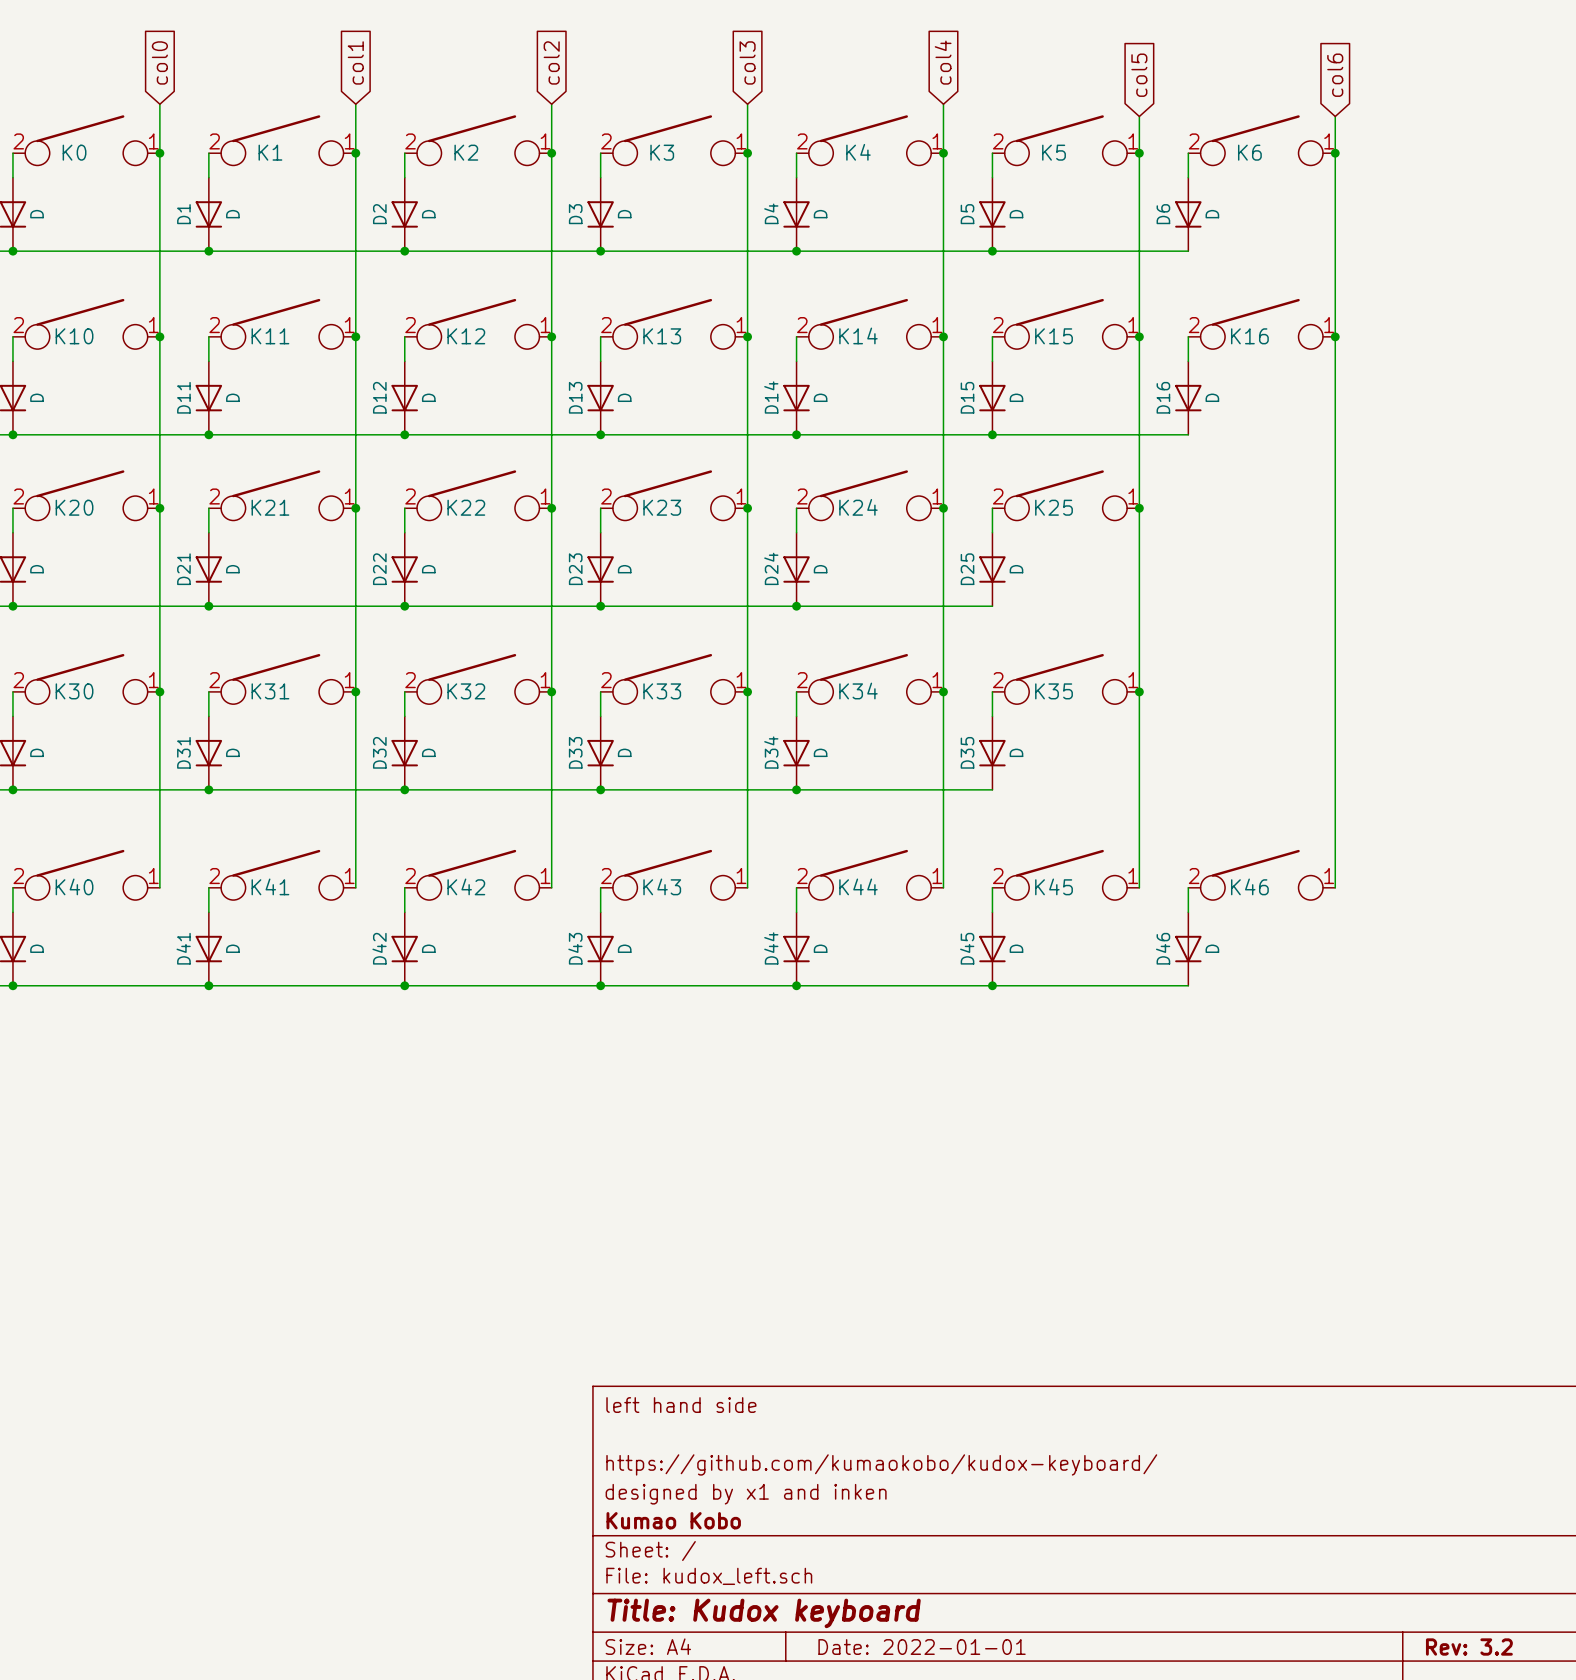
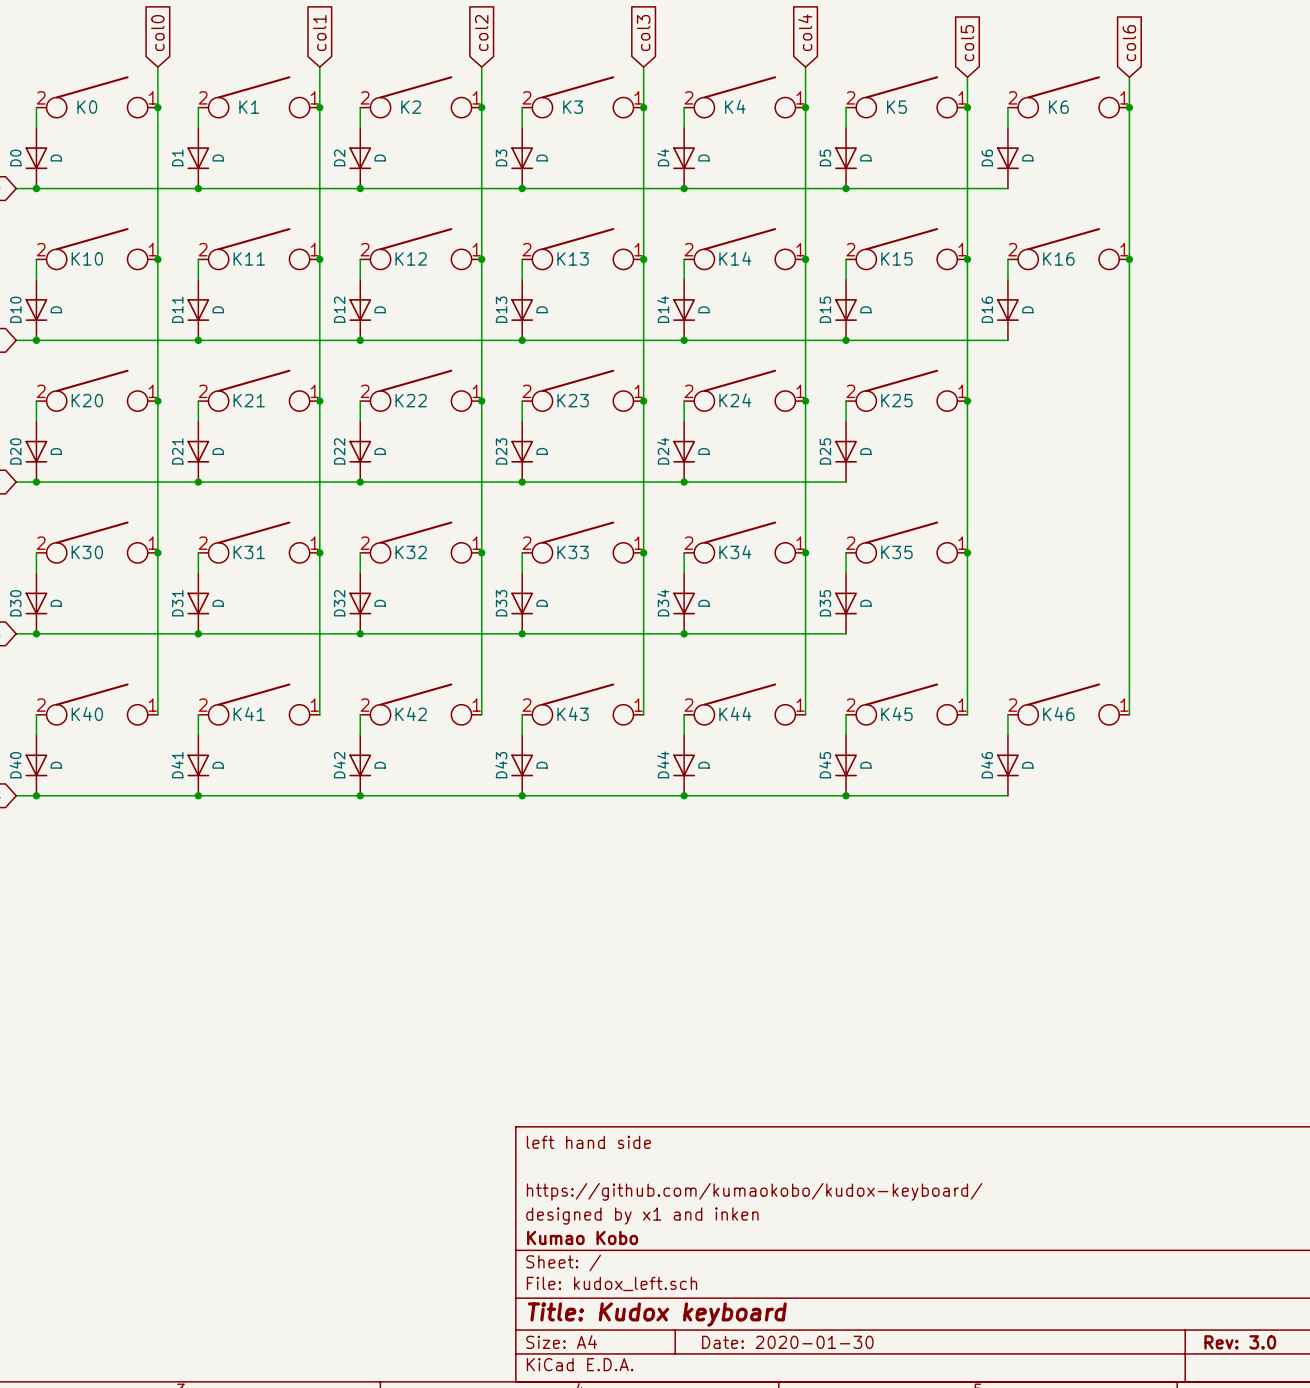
title block: Date: 2022-01-01 (922, 1647) -> Date: 2020-01-30 (787, 1342)
title block: Rev: 3.2 (1469, 1647) -> Rev: 3.0 (1240, 1342)

